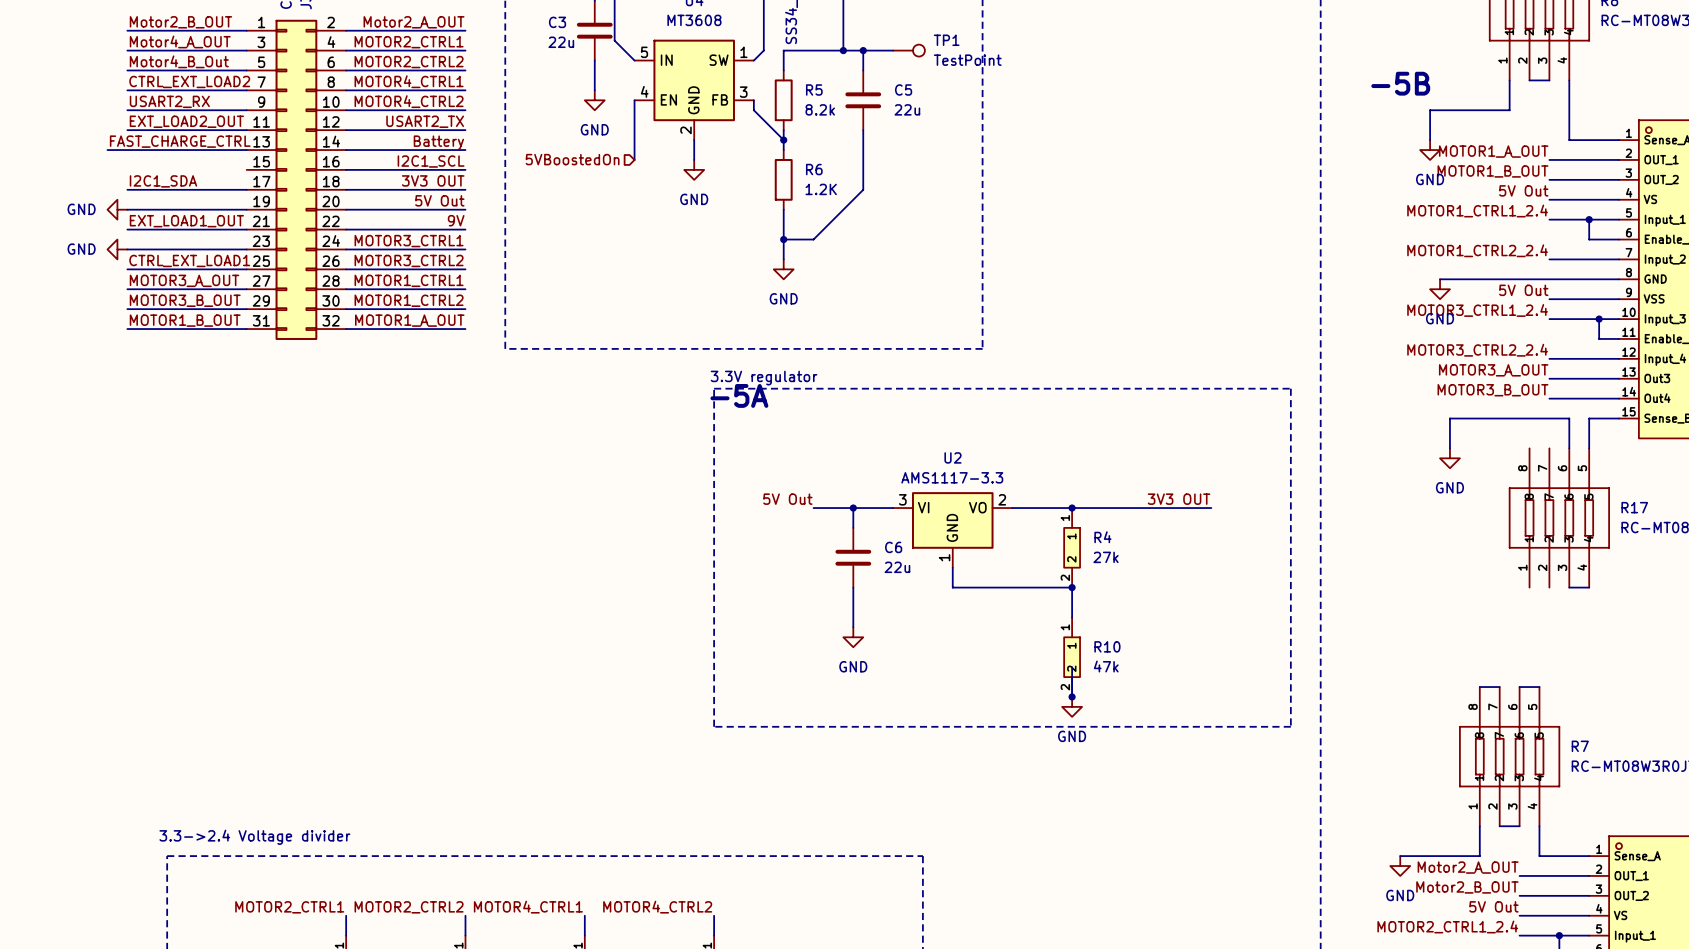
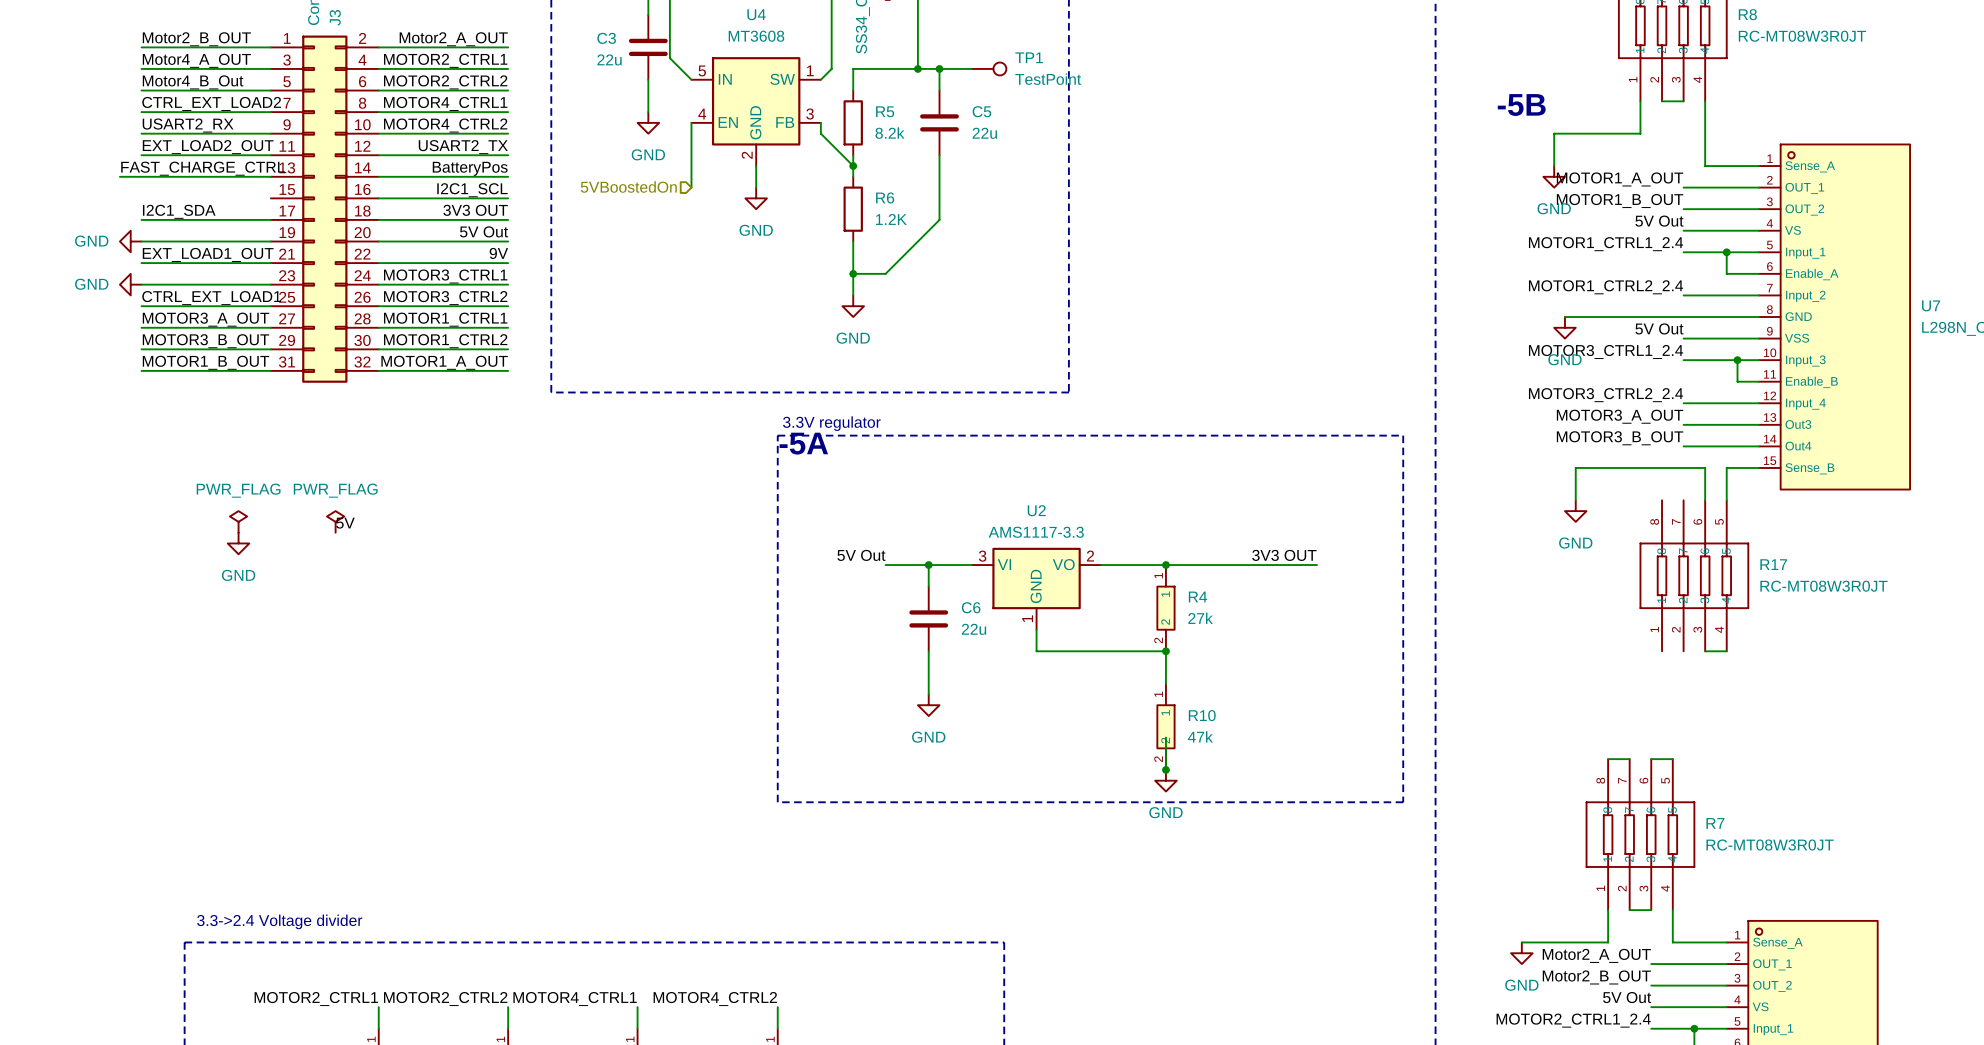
label: Battery (438, 142) -> BatteryPos (470, 168)
power symbol: none -> PWR_FLAG (238, 521)
power symbol: none -> PWR_FLAG (335, 521)
label: none -> 5V (345, 523)
power symbol: none -> GND (238, 543)

